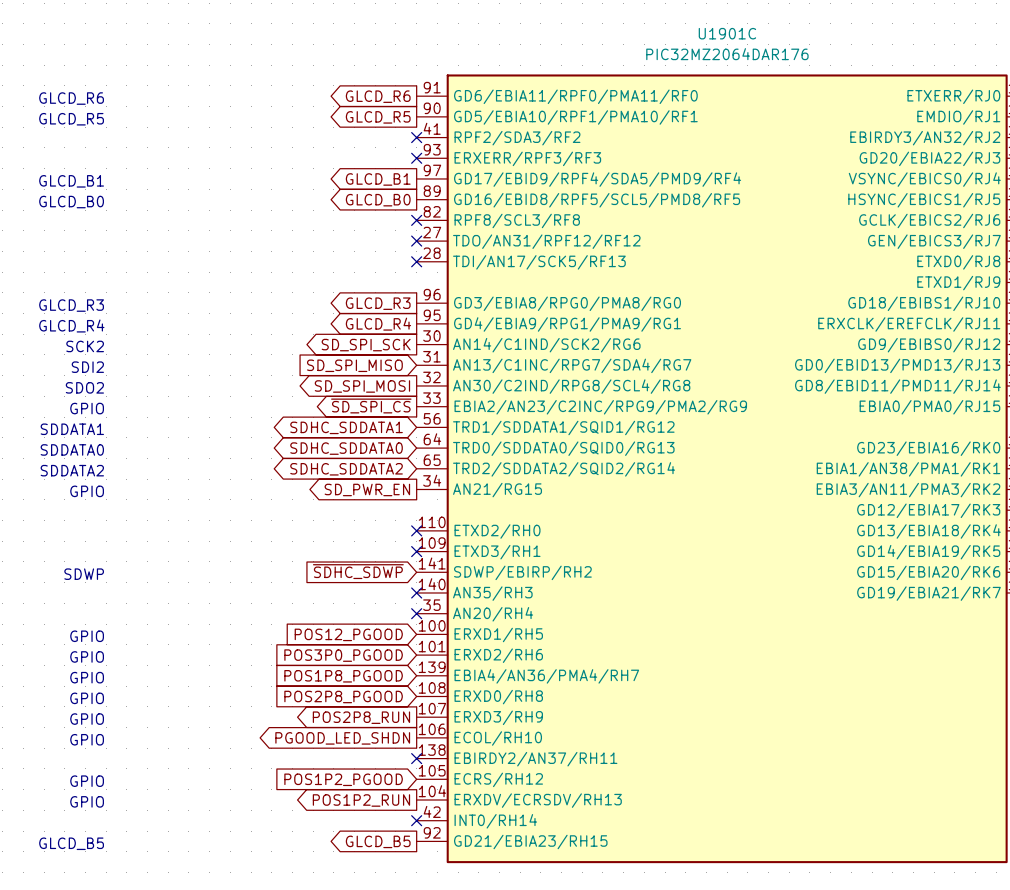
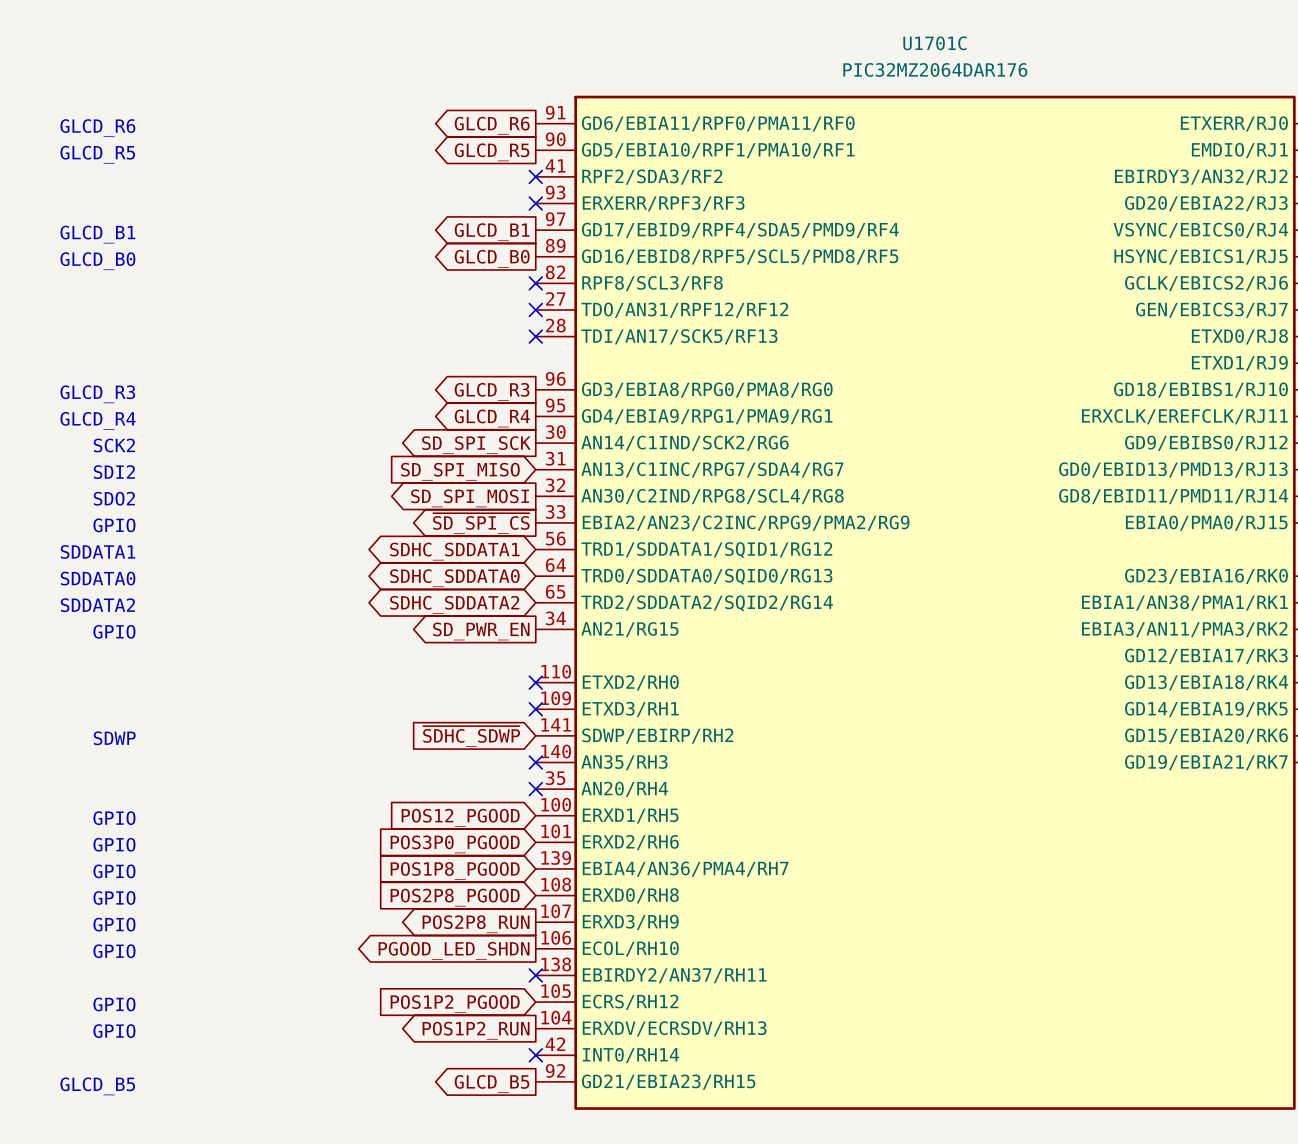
U1901C name: U1901C (727, 33) -> U1701C (934, 43)

